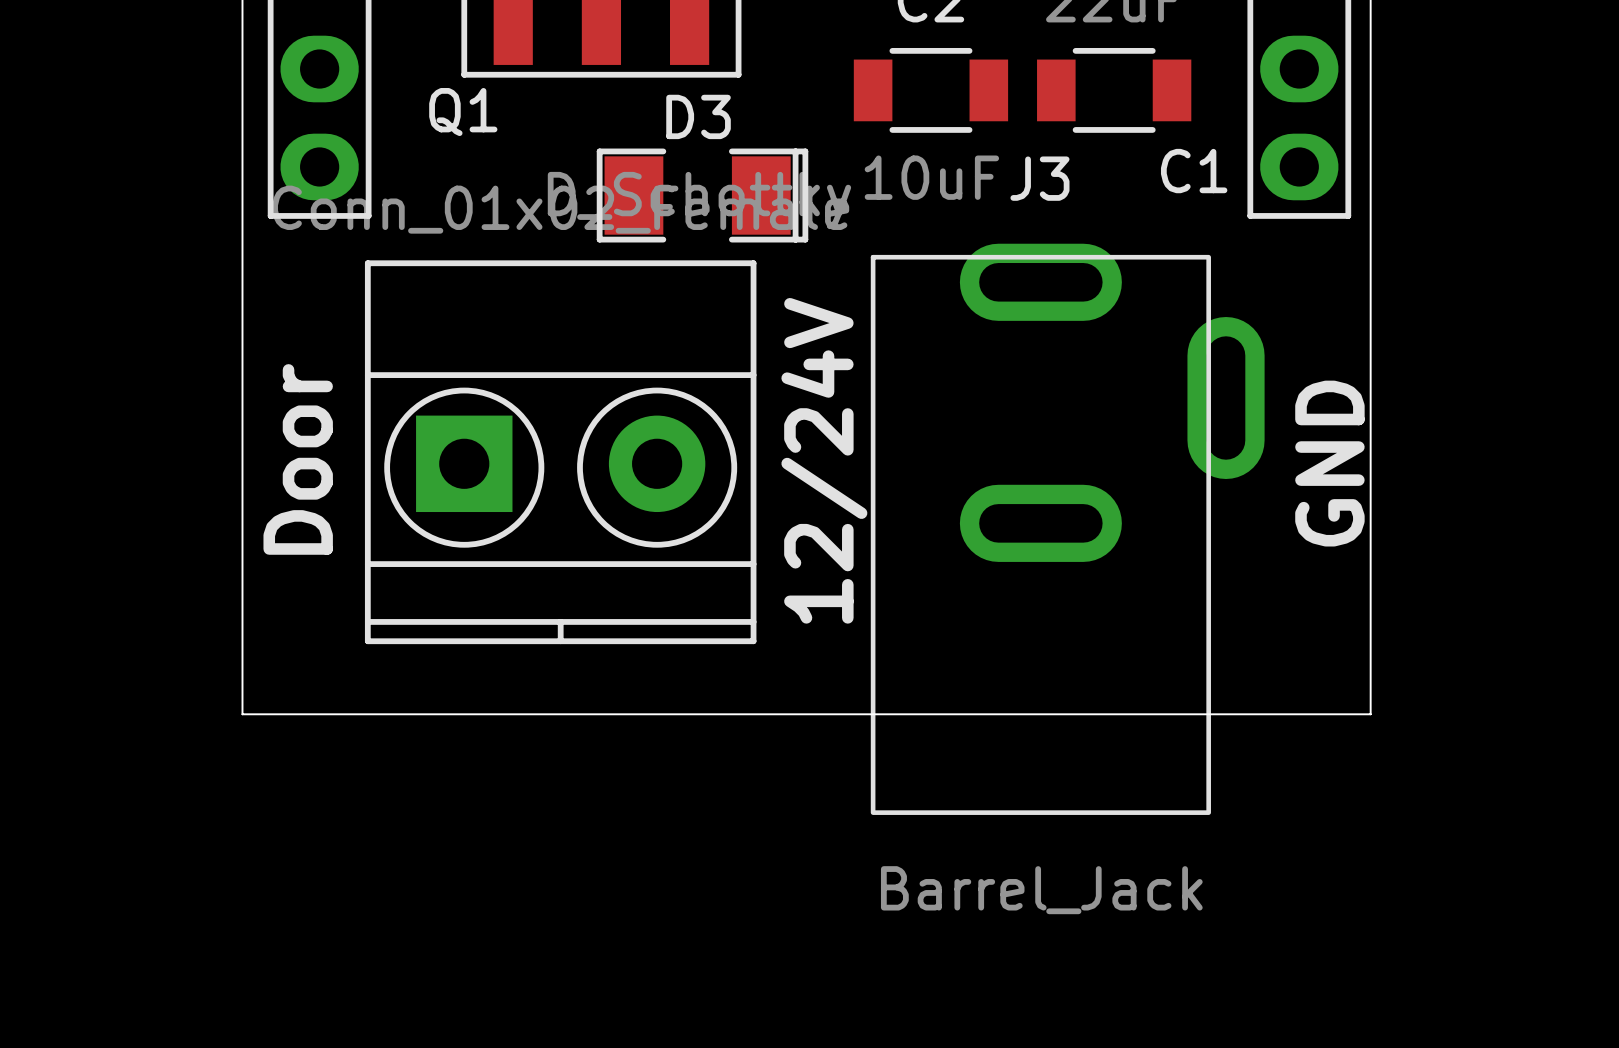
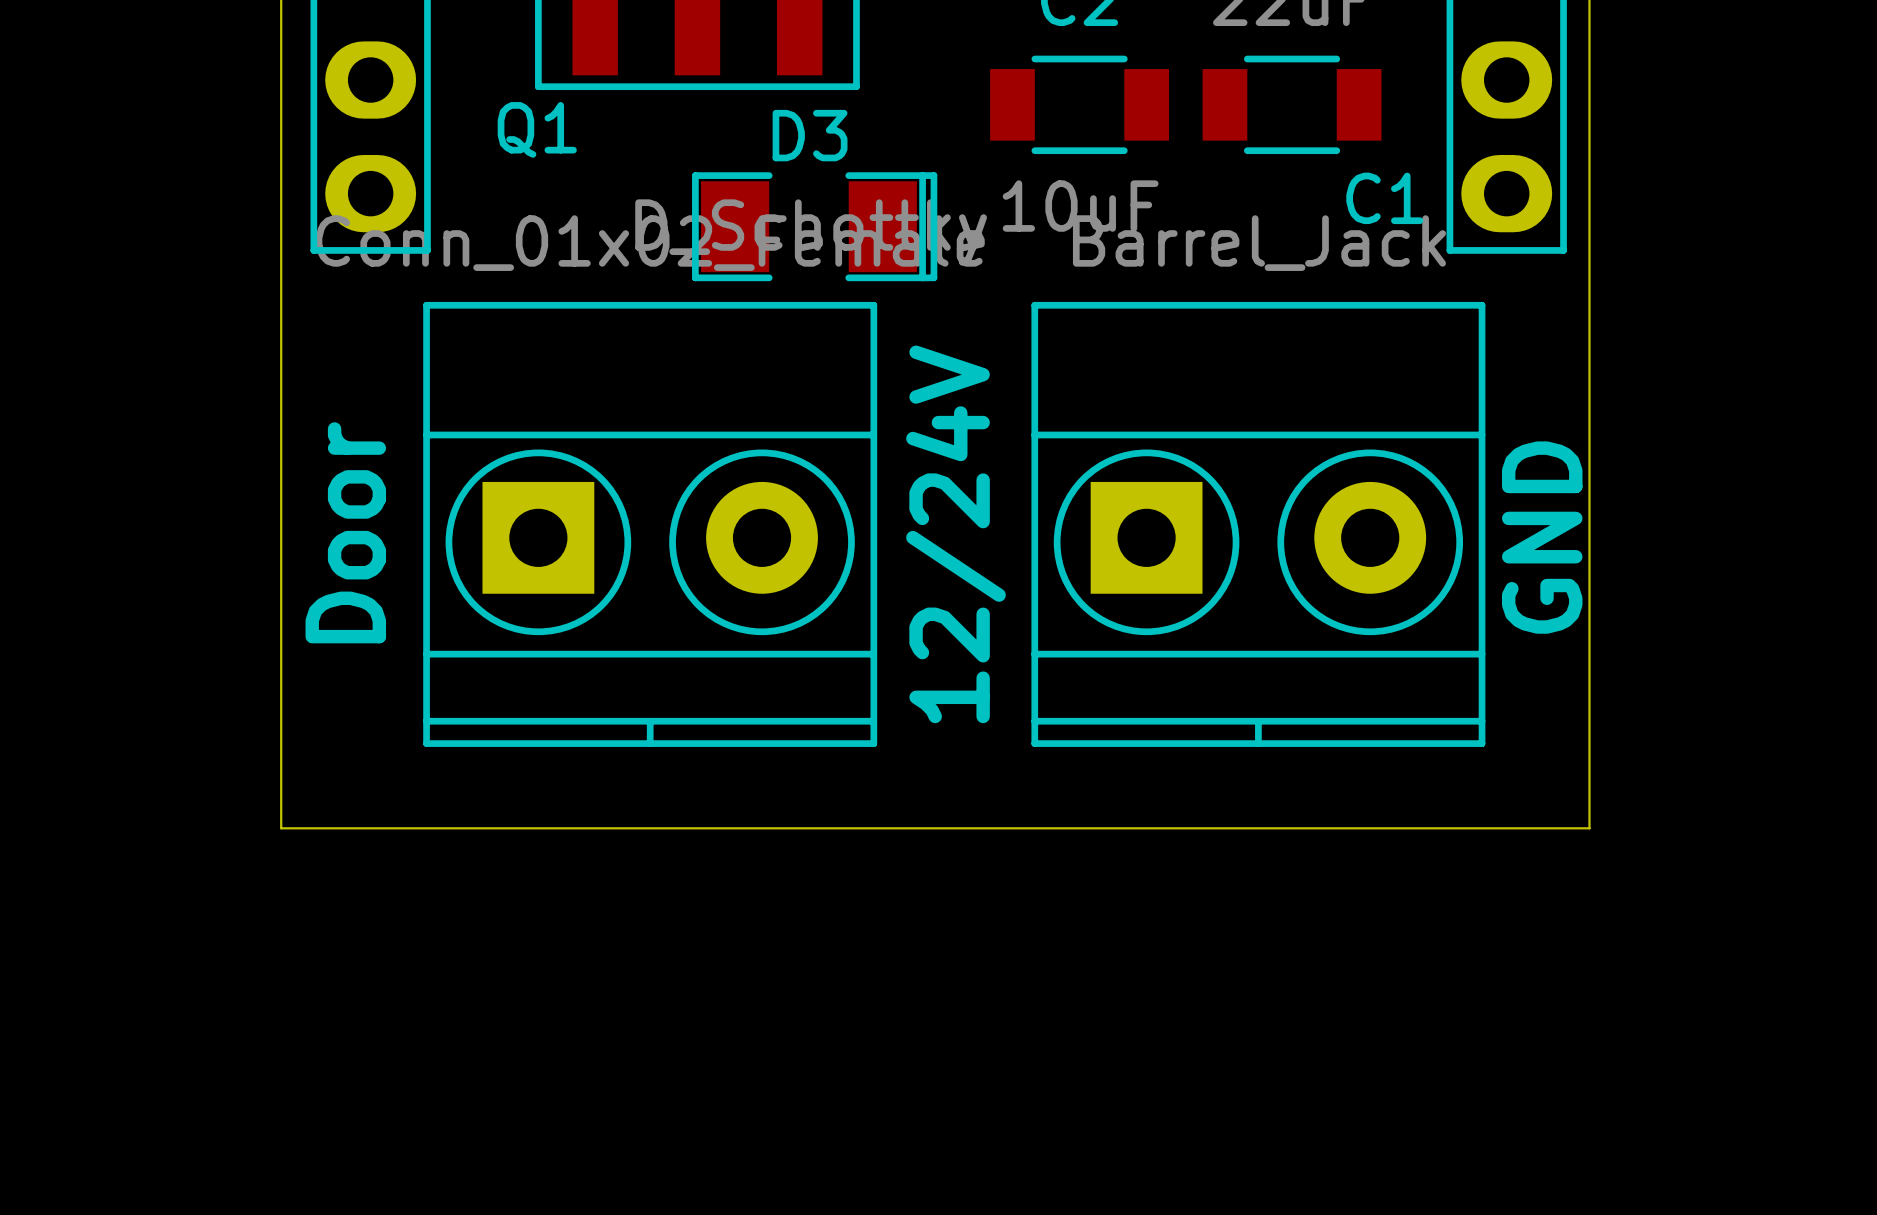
part: none -> Barrel_Jack (1258, 524)
J3: Barrel_Jack (1067, 529) -> none

